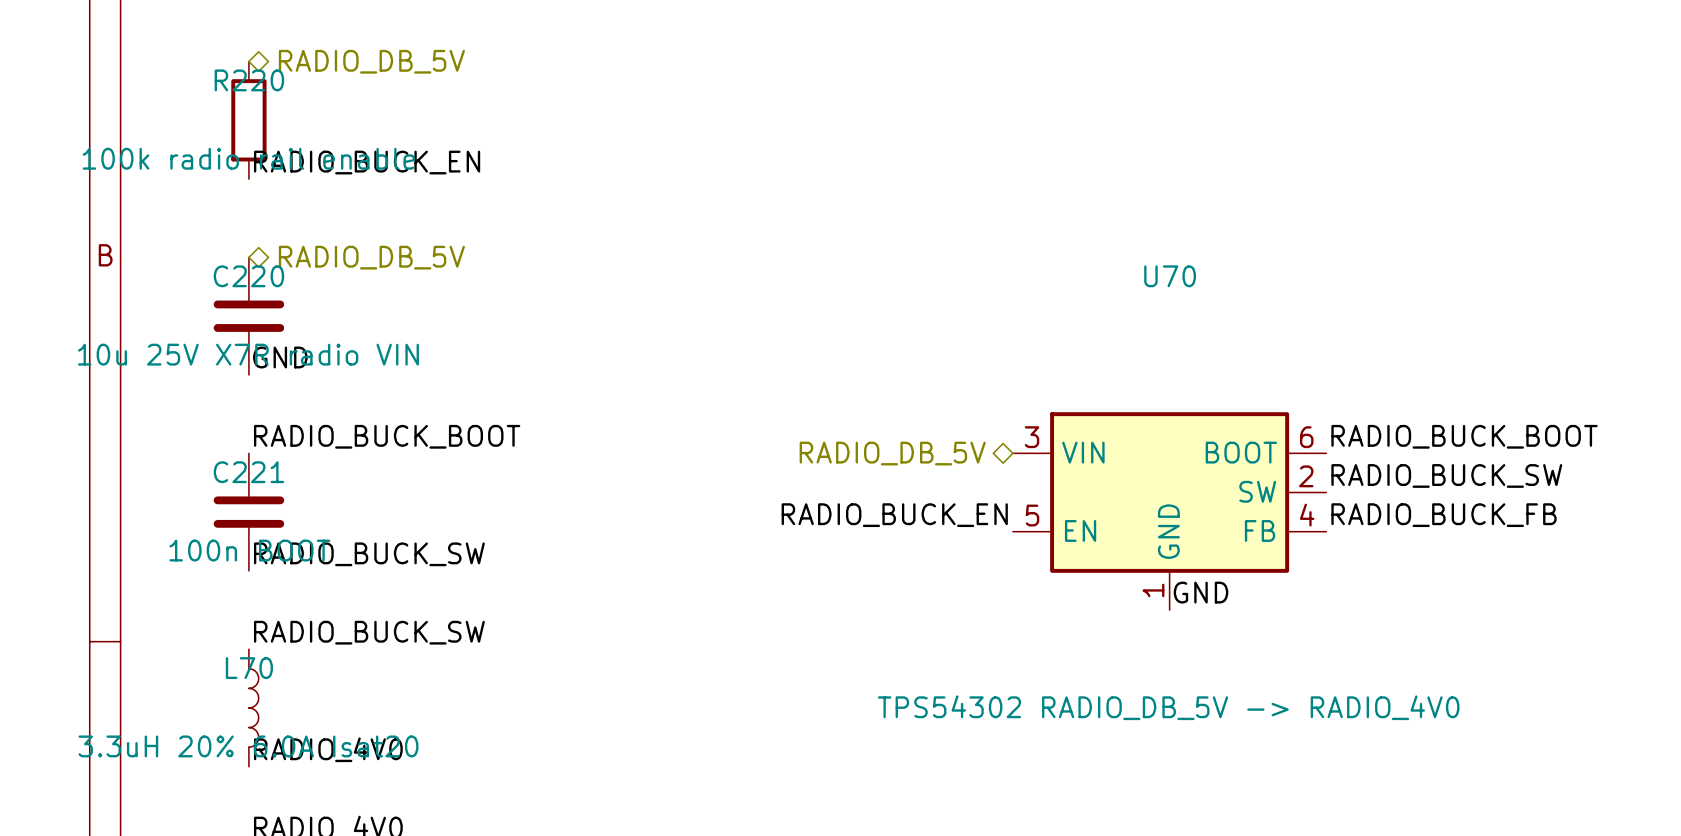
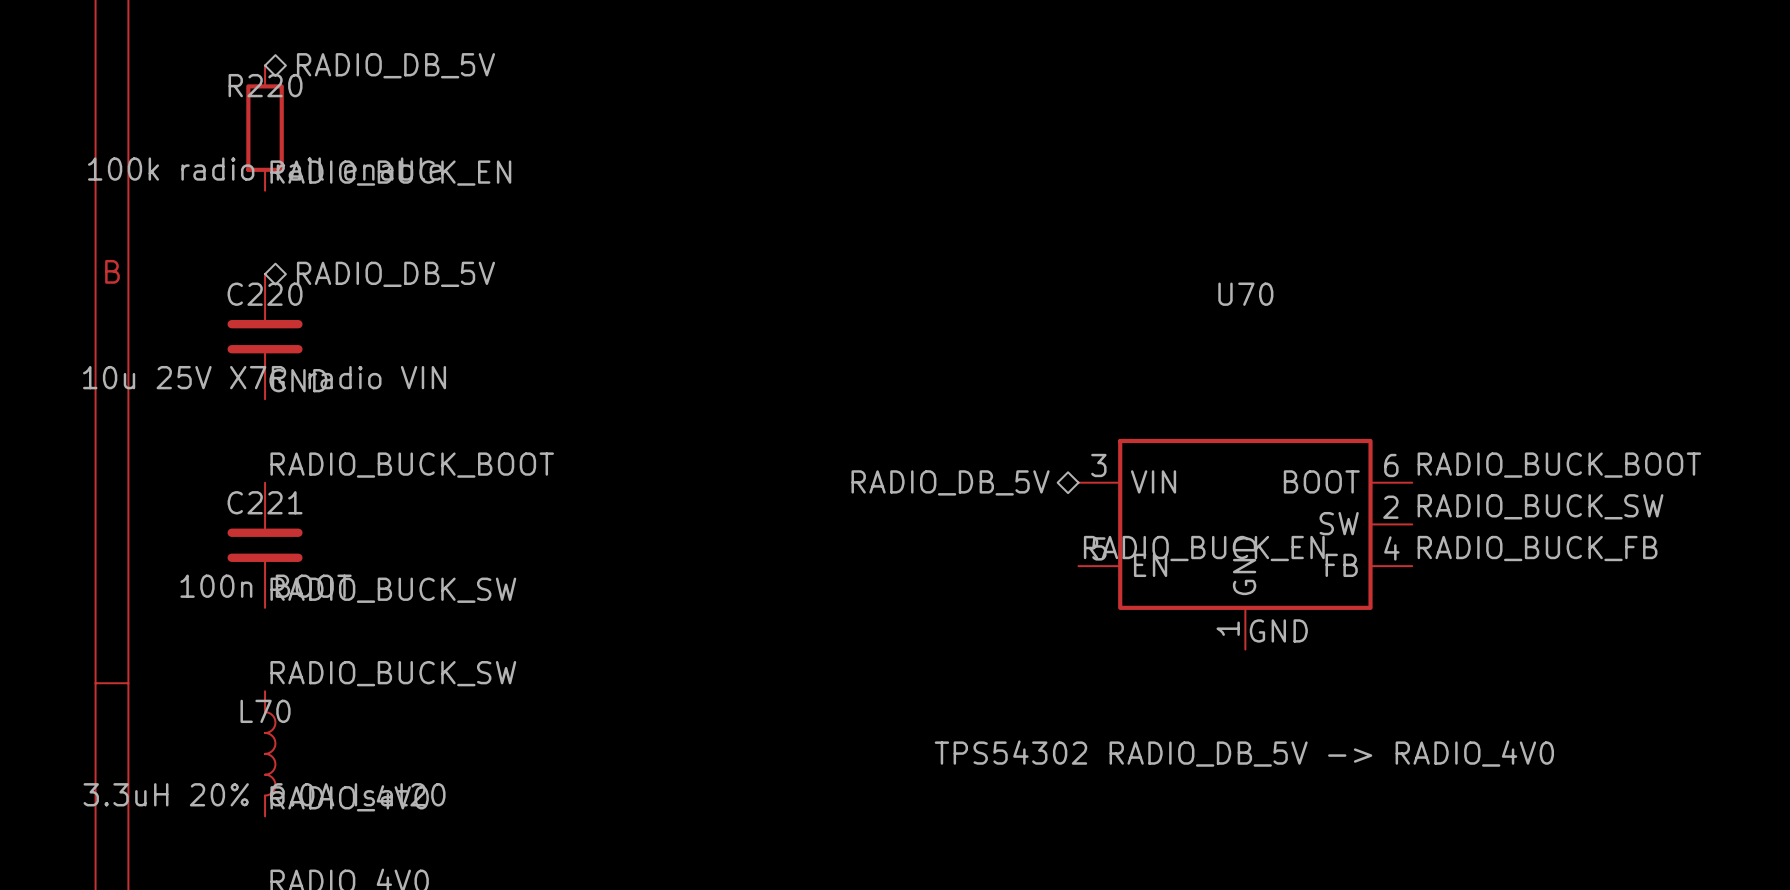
label position: RADIO_BUCK_EN (894, 515) -> RADIO_BUCK_EN (1204, 548)

